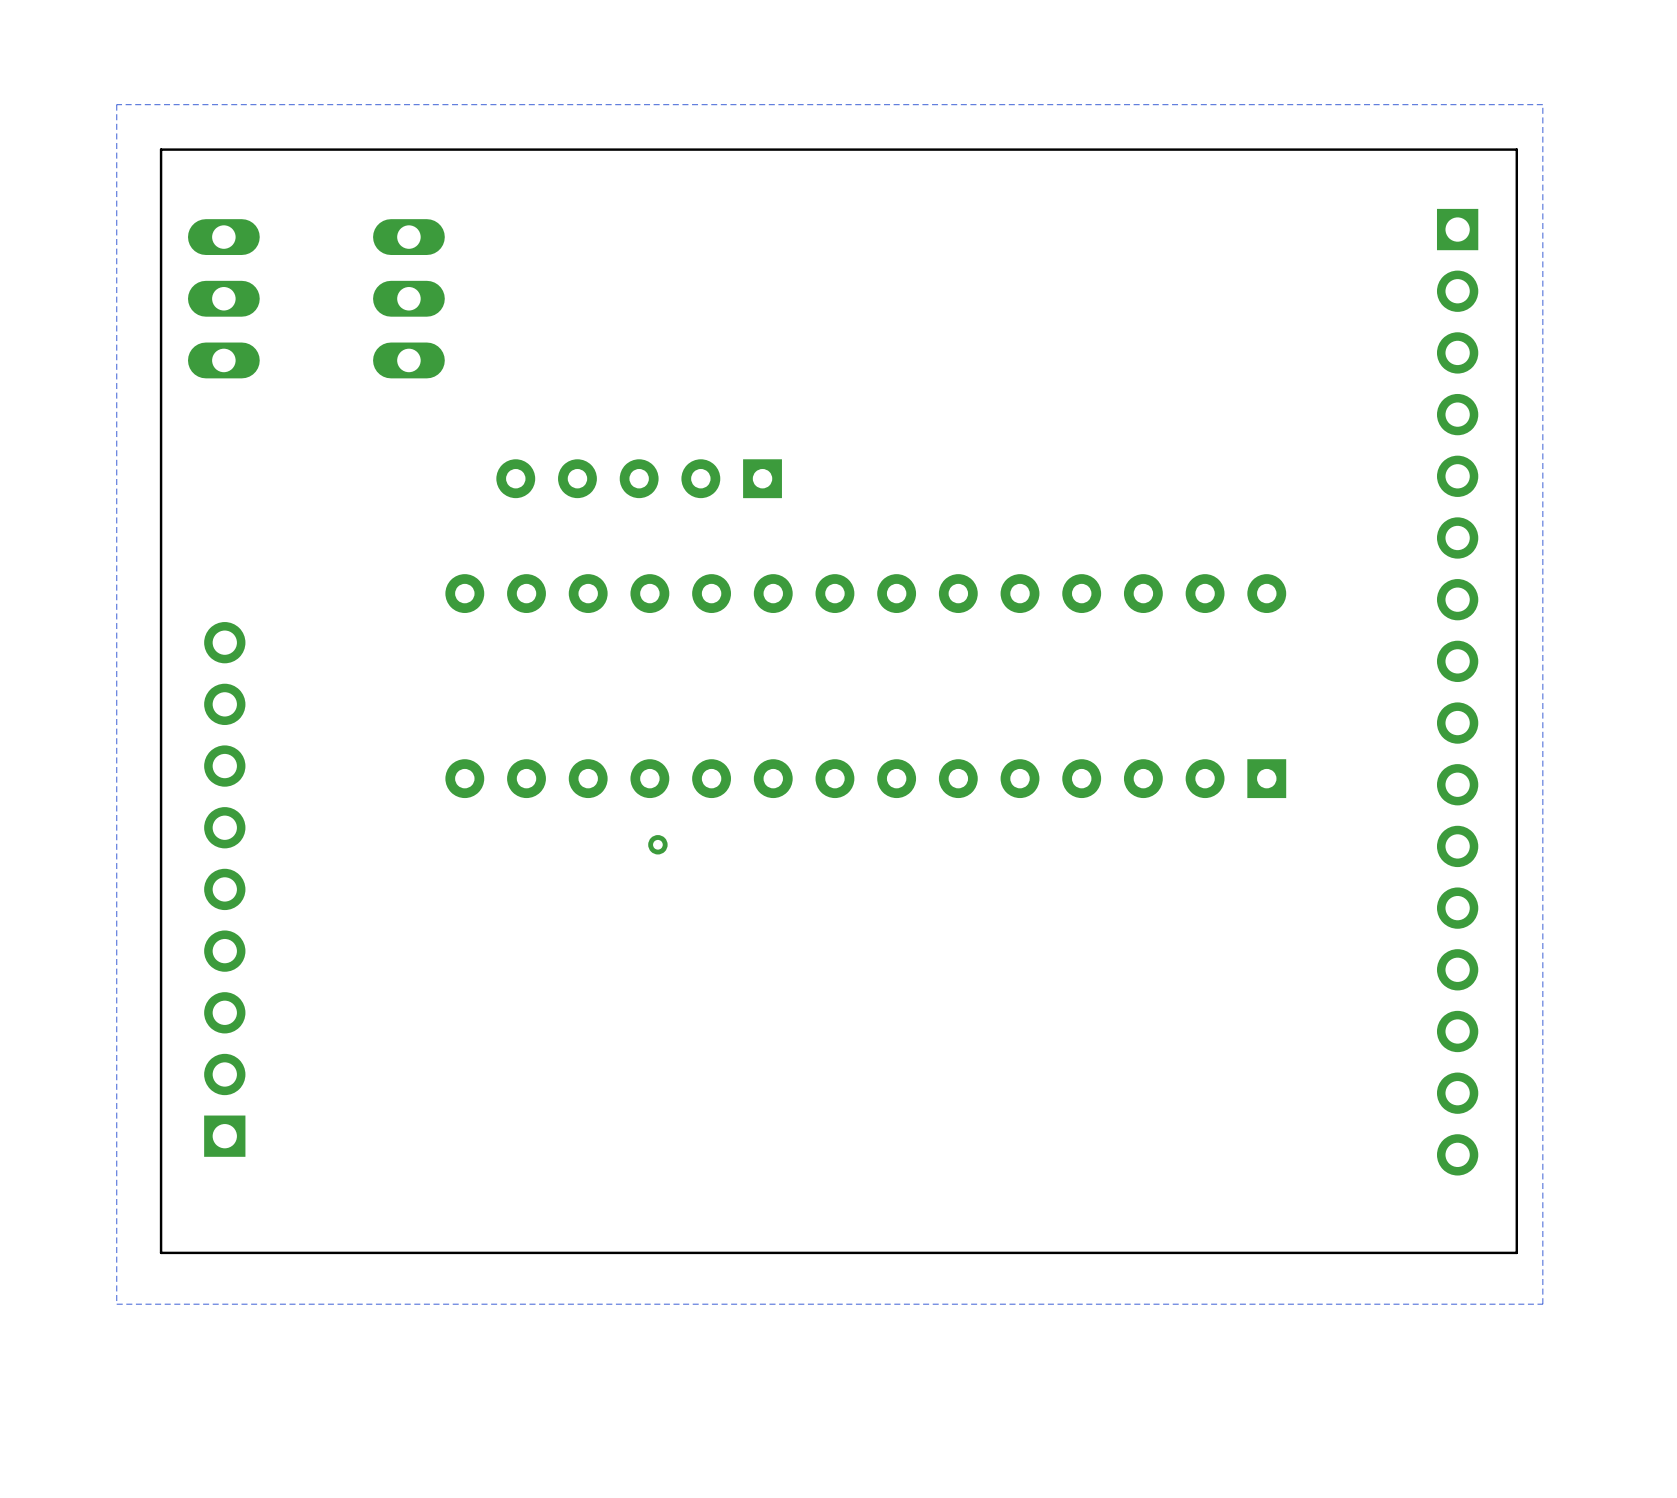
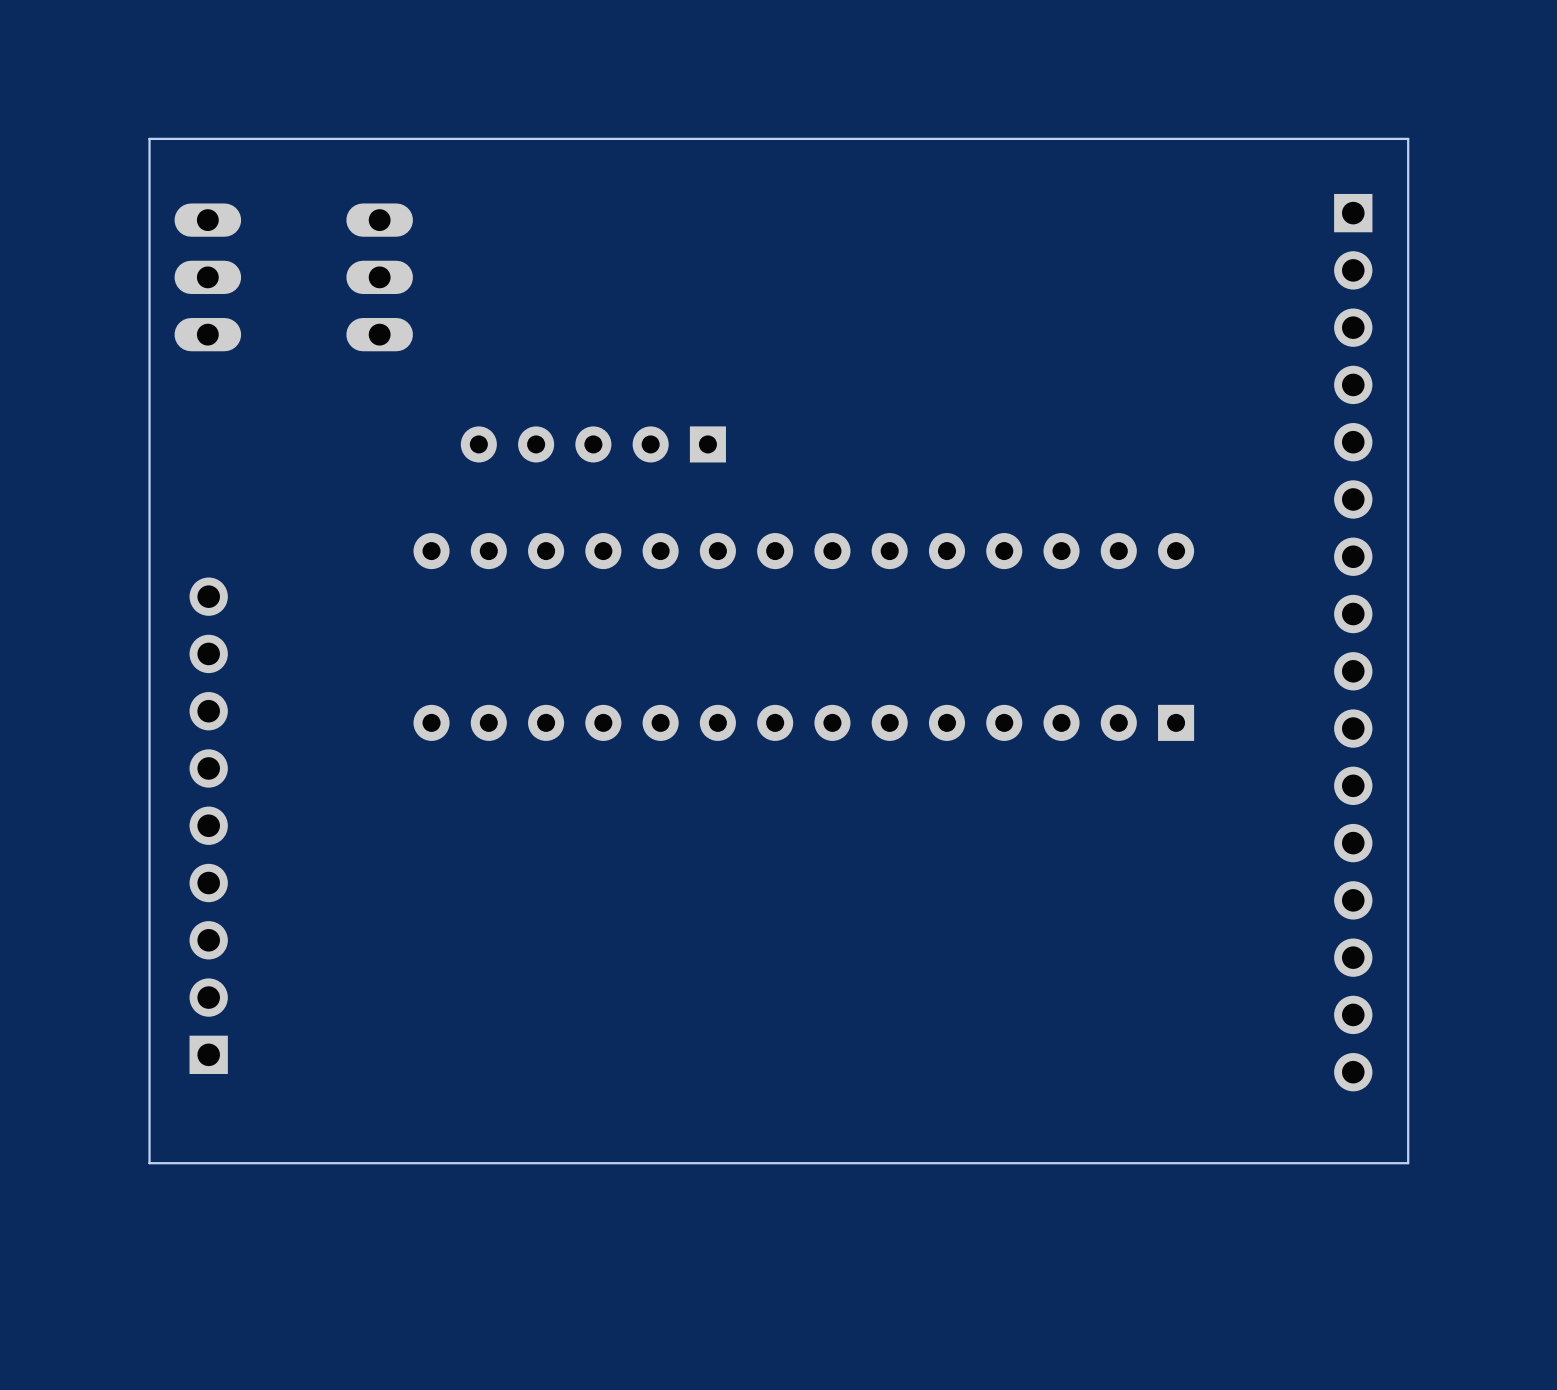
zone outline: (1542, 104) (1542, 1304) (116, 1304) (116, 104) (1542, 104) -> none
via: (657, 844) -> none

